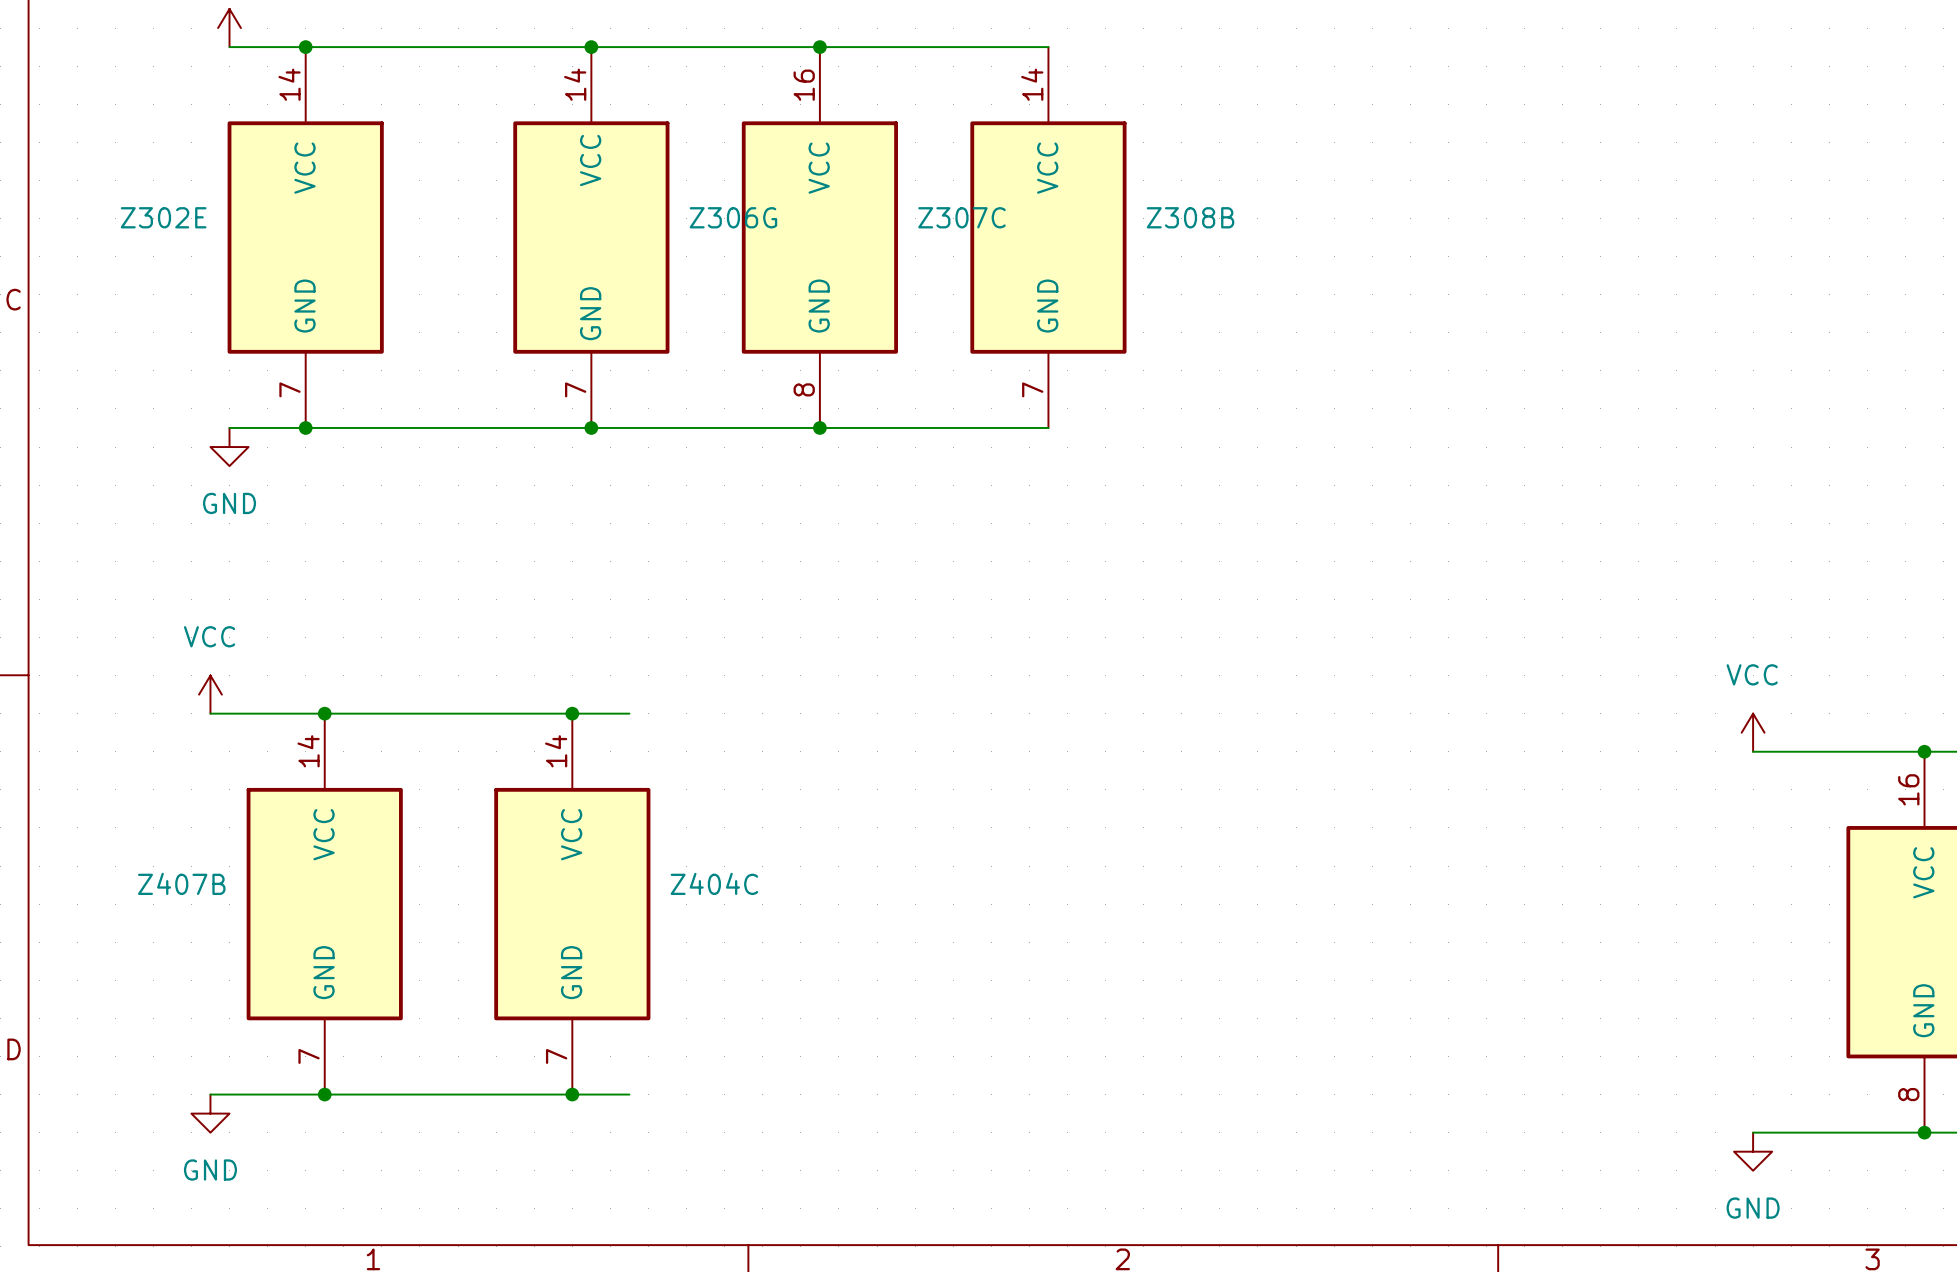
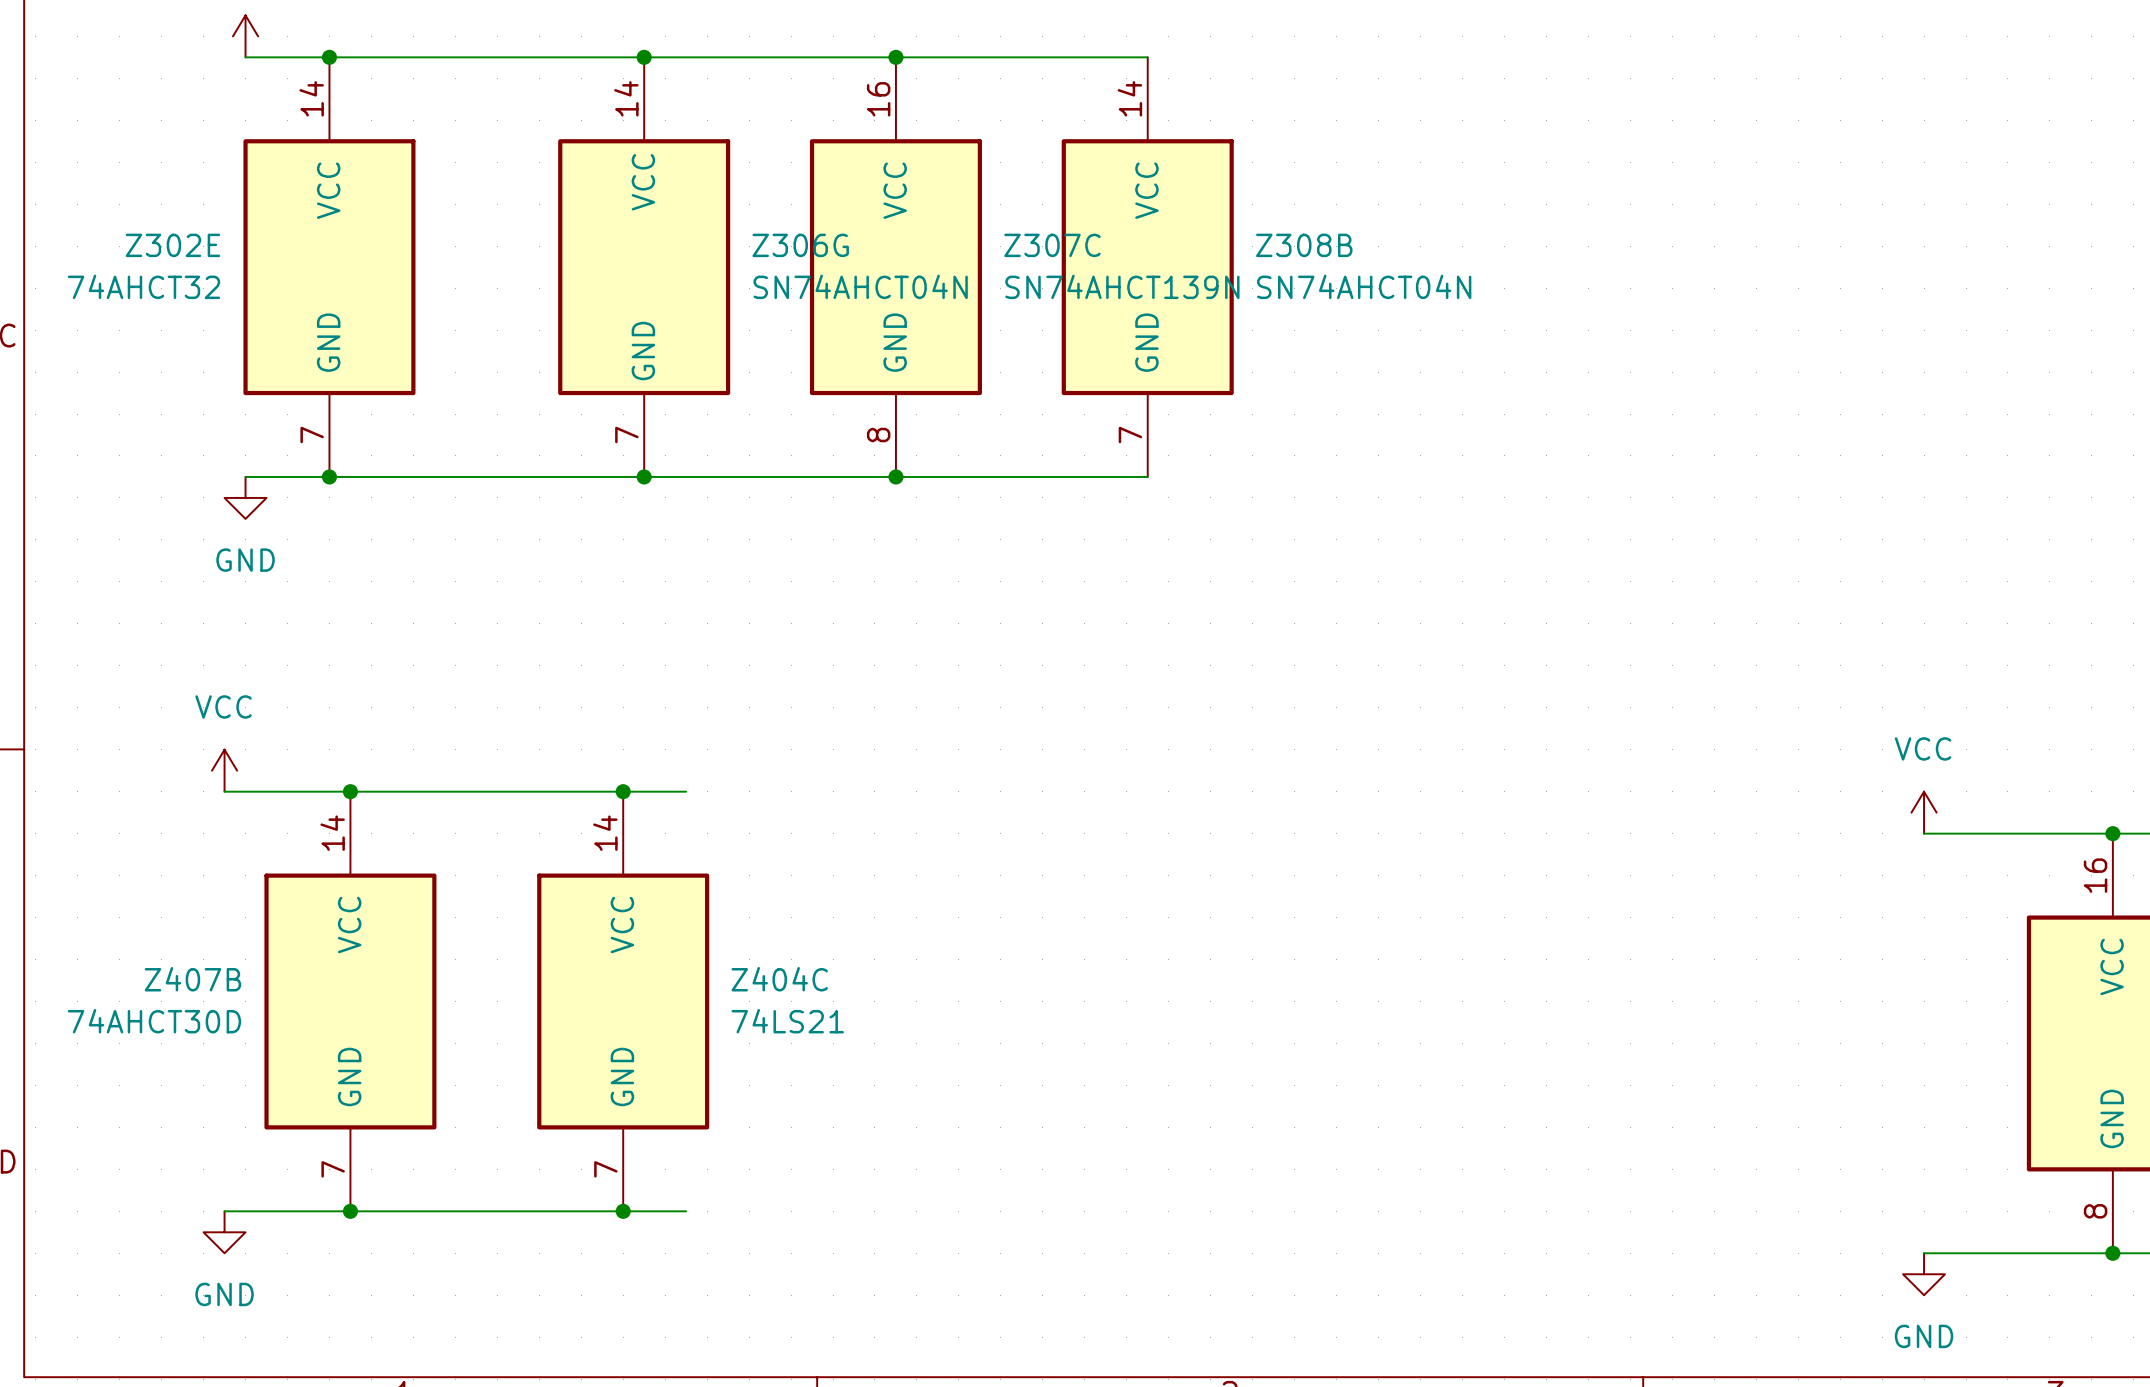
Z302E value: none -> 74AHCT32 (143, 286)
Z306G value: none -> SN74AHCT04N (860, 286)
Z307C value: none -> SN74AHCT139N (1122, 286)
Z308B value: none -> SN74AHCT04N (1364, 286)
Z407B value: none -> 74AHCT30D (154, 1021)
Z404C value: none -> 74LS21 (787, 1021)

